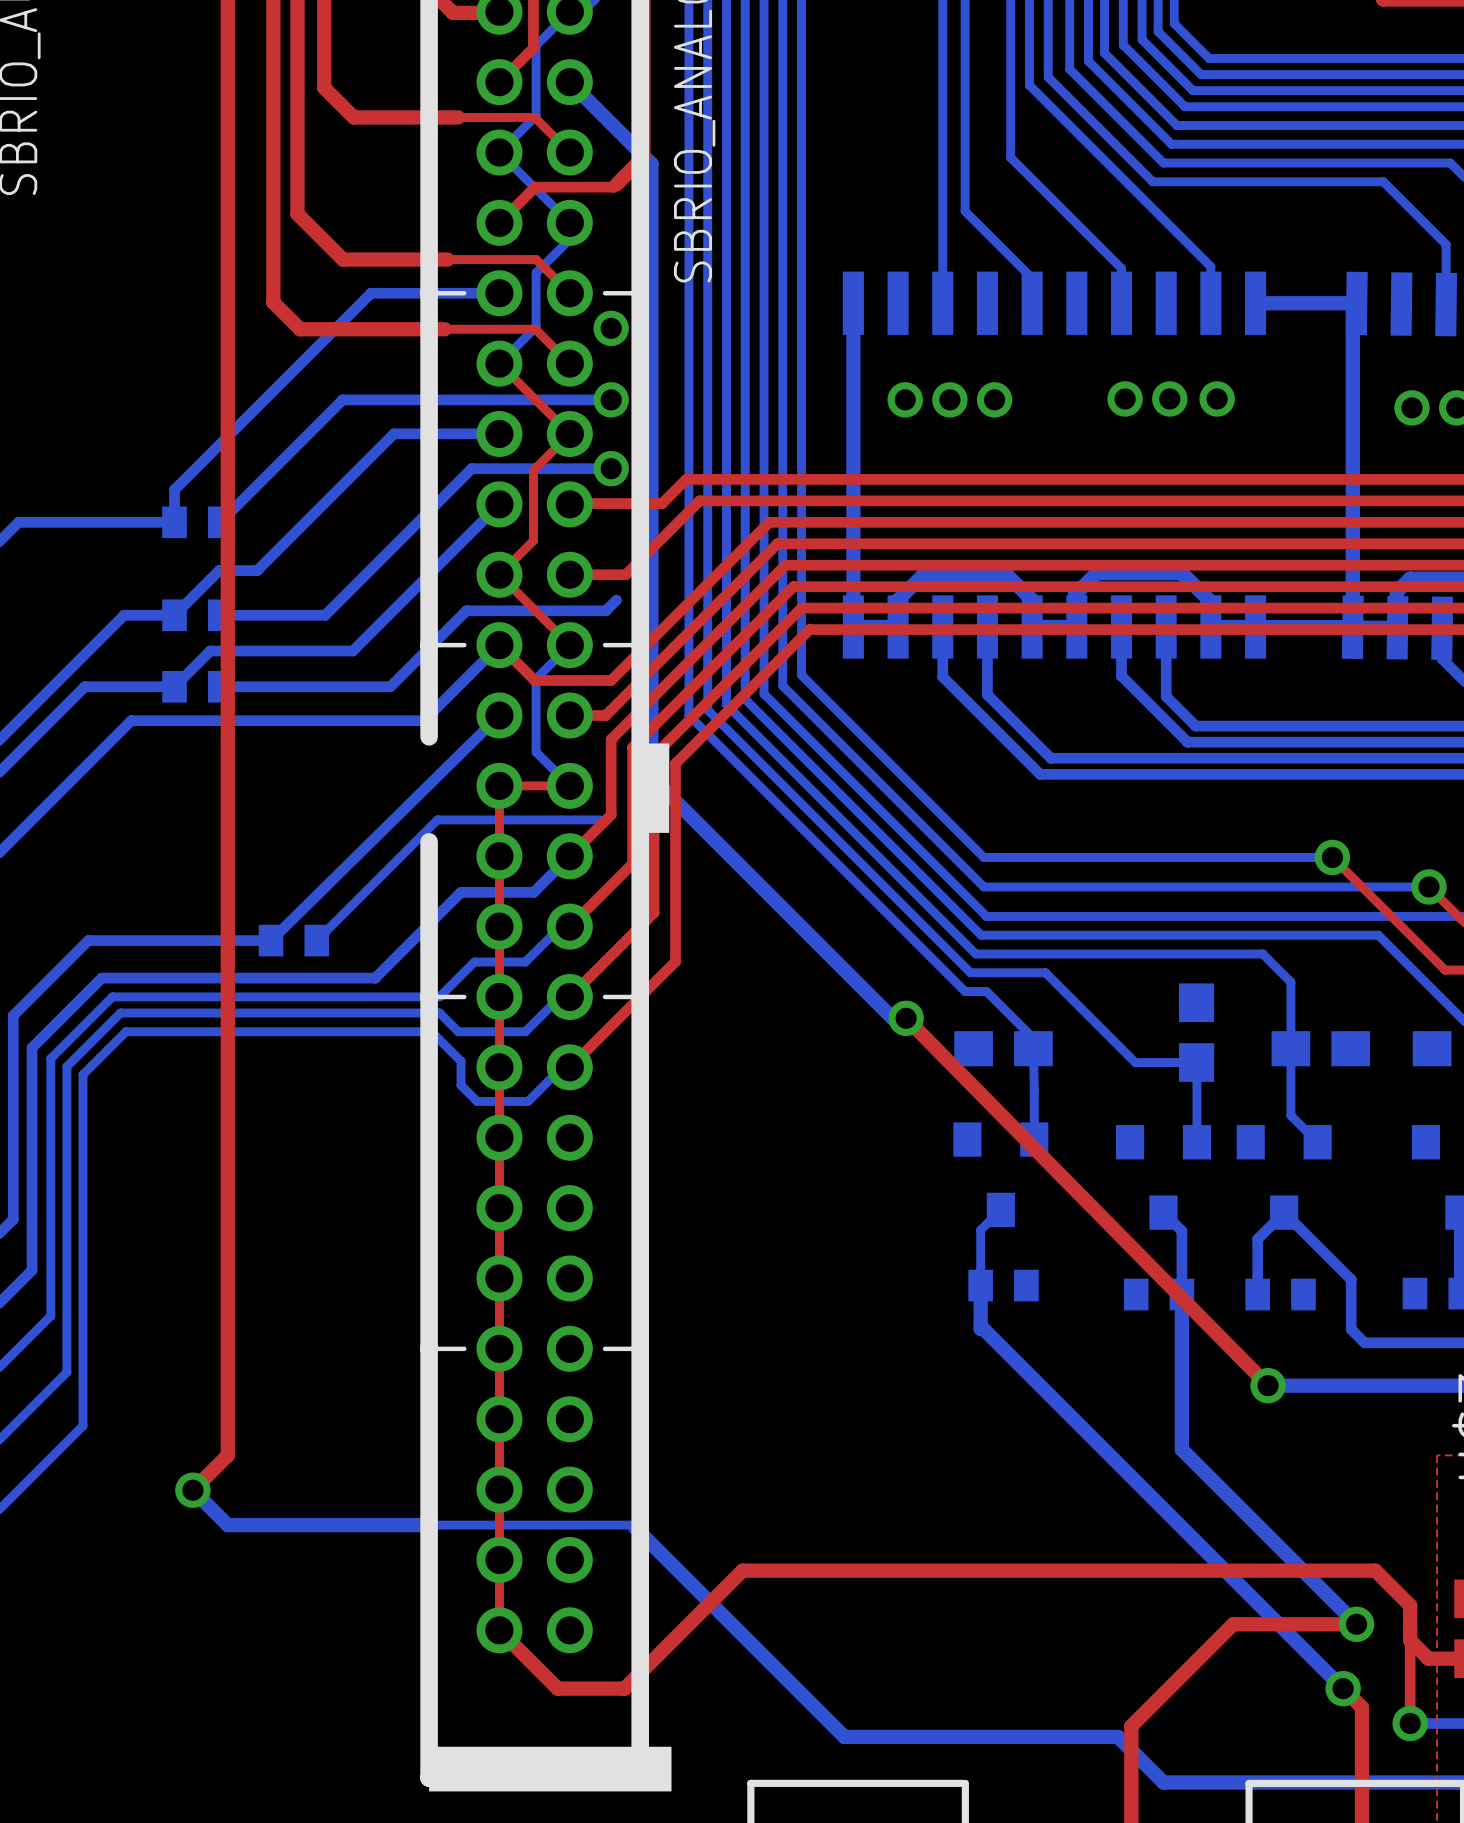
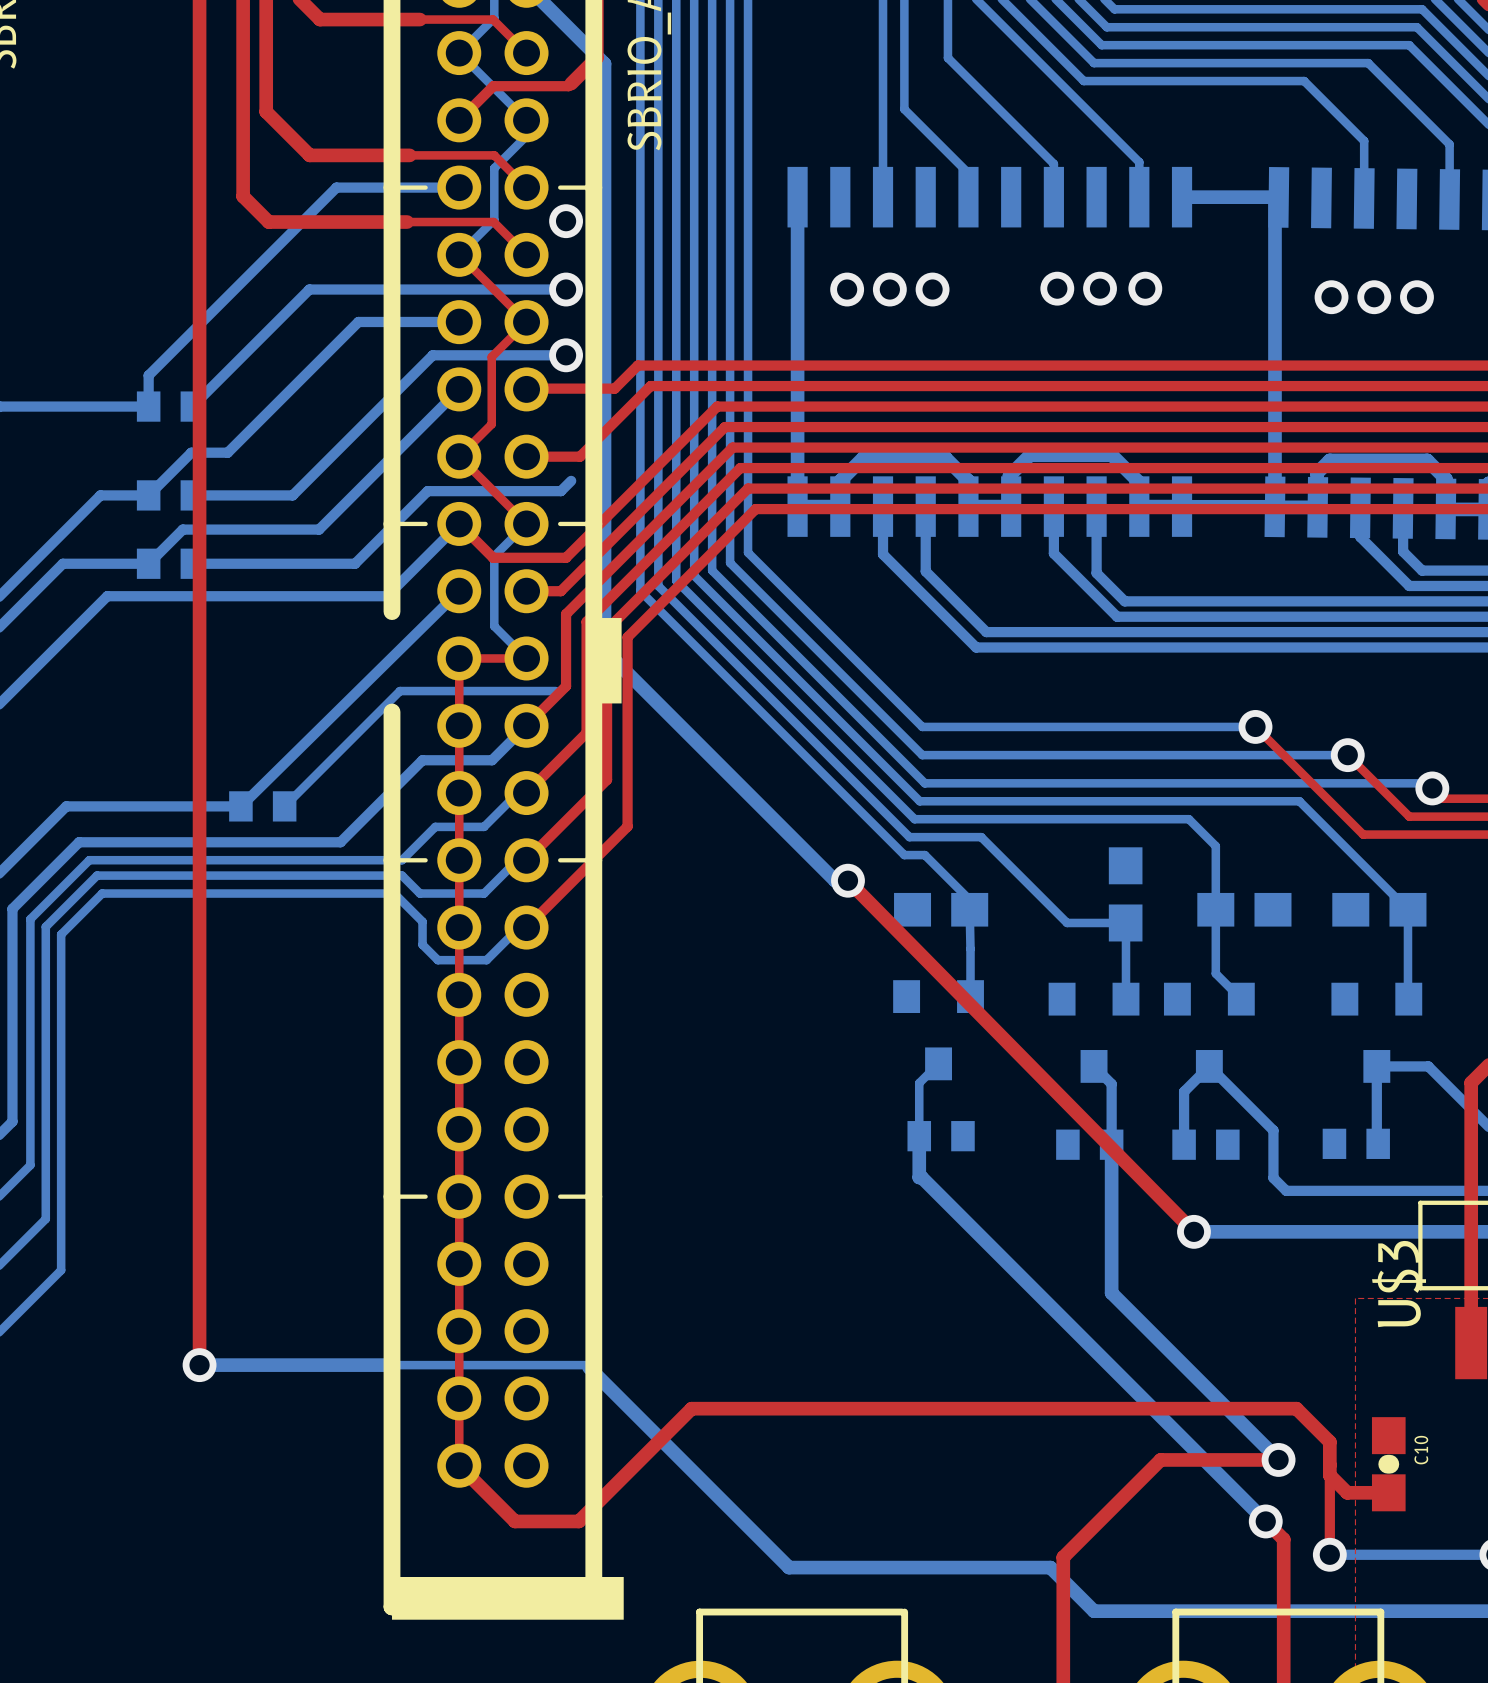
top track: (227, 1455) (192, 1490) -> (199, 1298) (199, 1365)
bottom track: (192, 1490) (227, 1525) -> none
via position: (192, 1490) -> (199, 1365)

